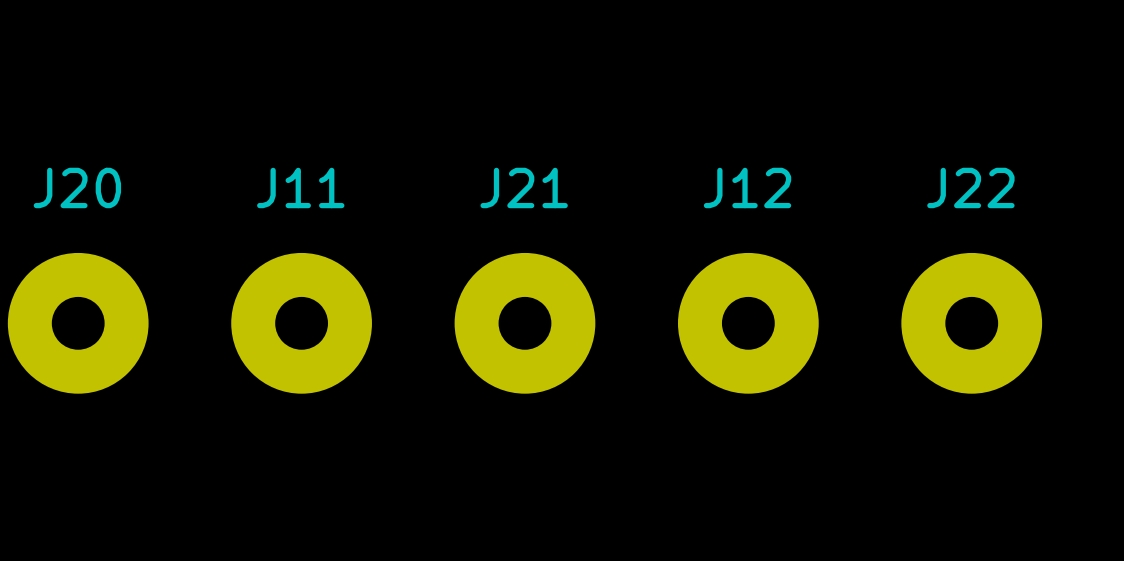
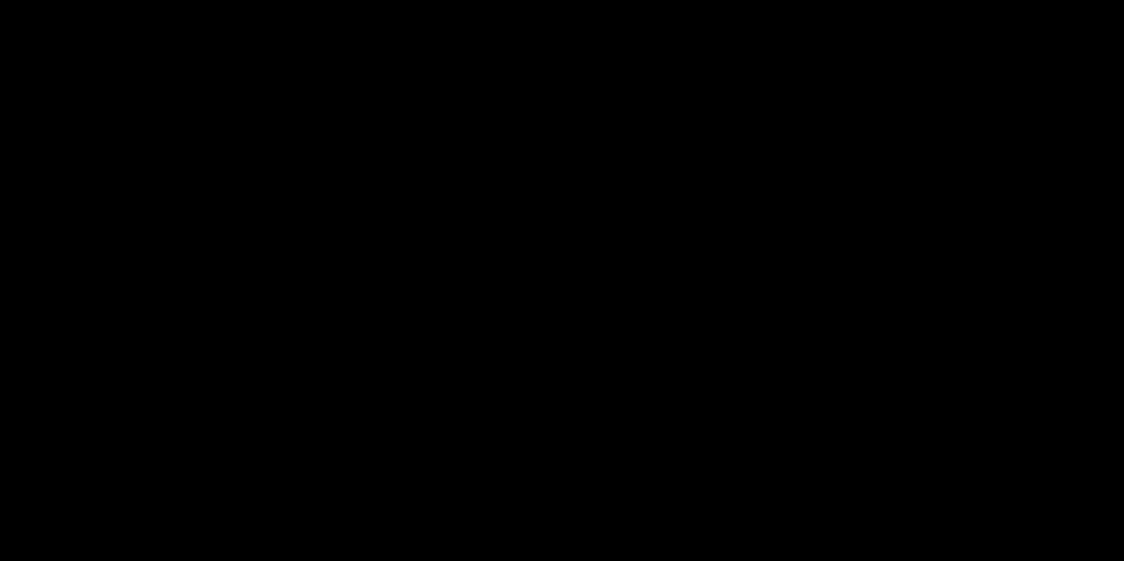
J20: (78, 323) -> none
J11: (301, 323) -> none
J21: (524, 323) -> none
J12: (748, 323) -> none
J22: (971, 323) -> none

